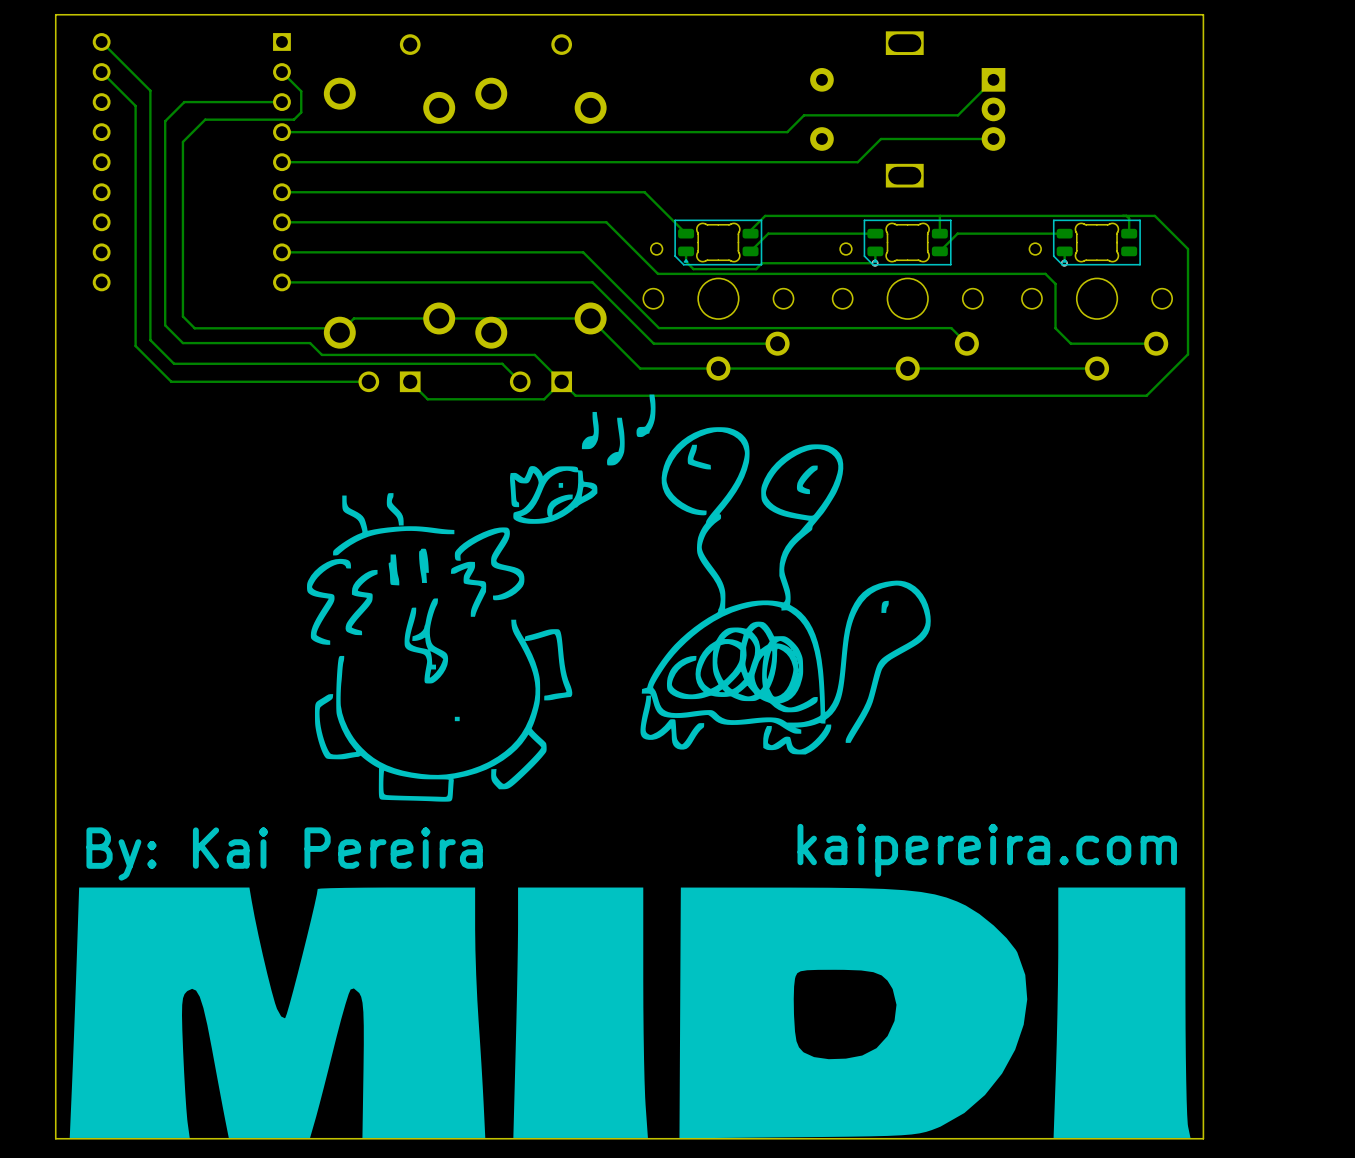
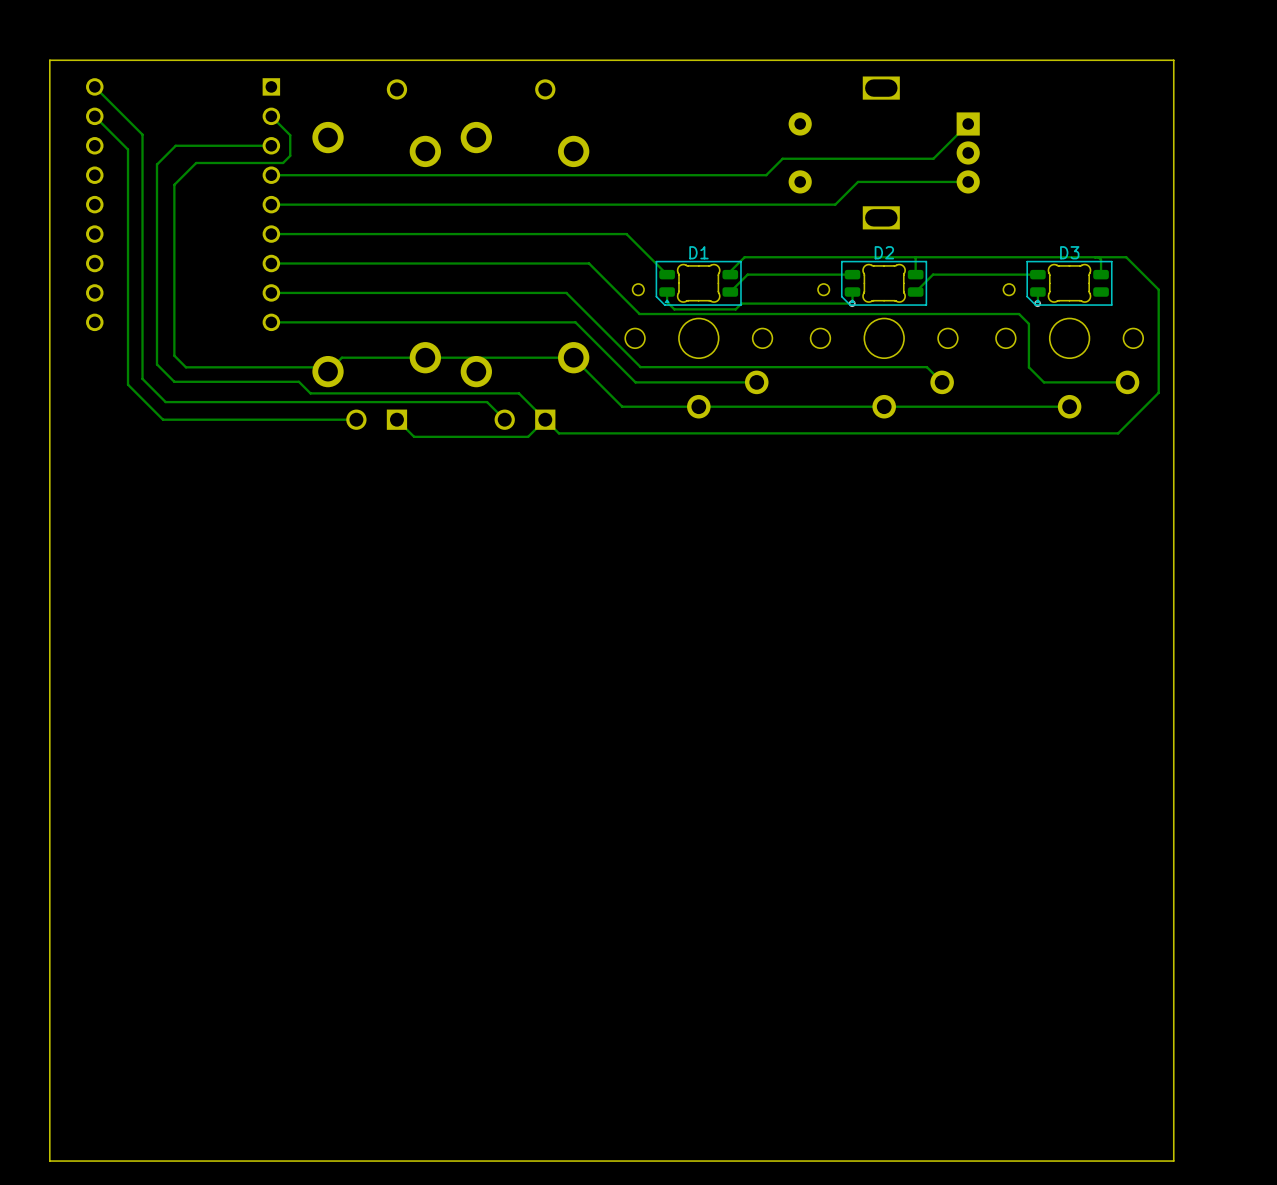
D1 name: none -> D1 (698, 252)
D2 name: none -> D2 (884, 252)
D3 name: none -> D3 (1069, 252)
drawing: [307, 394, 931, 802] -> none
text: kaipereira.com (987, 850) -> none
text: By: Kai Pereira (284, 854) -> none
drawing: [69, 887, 1191, 1139] -> none

